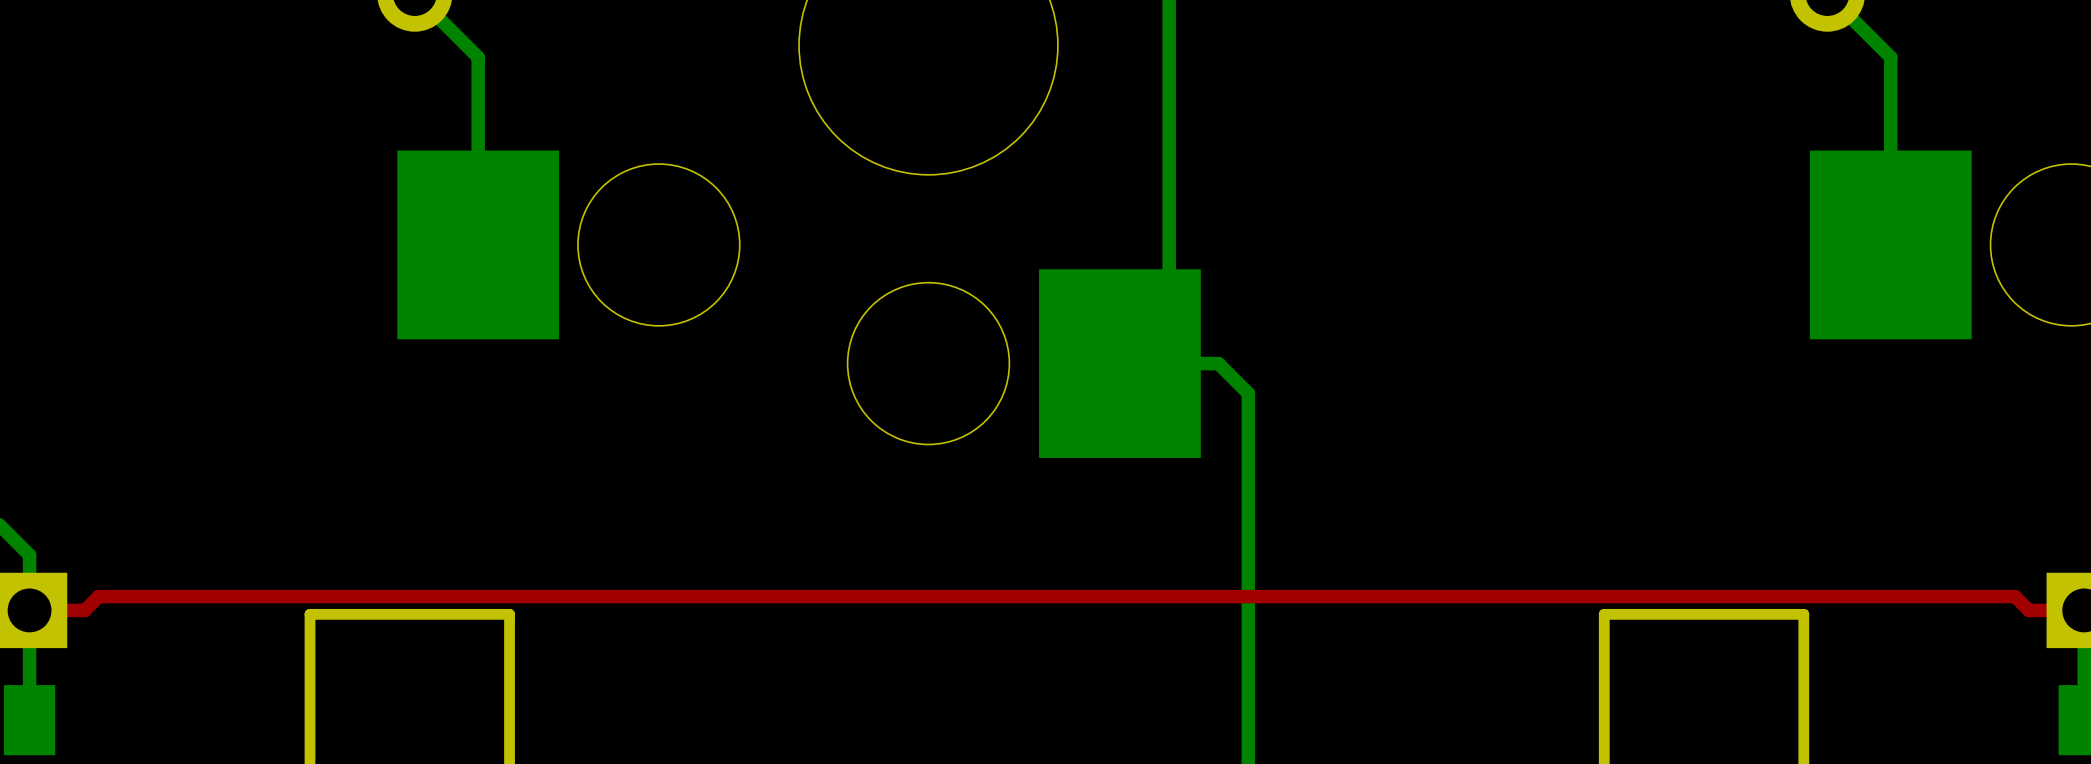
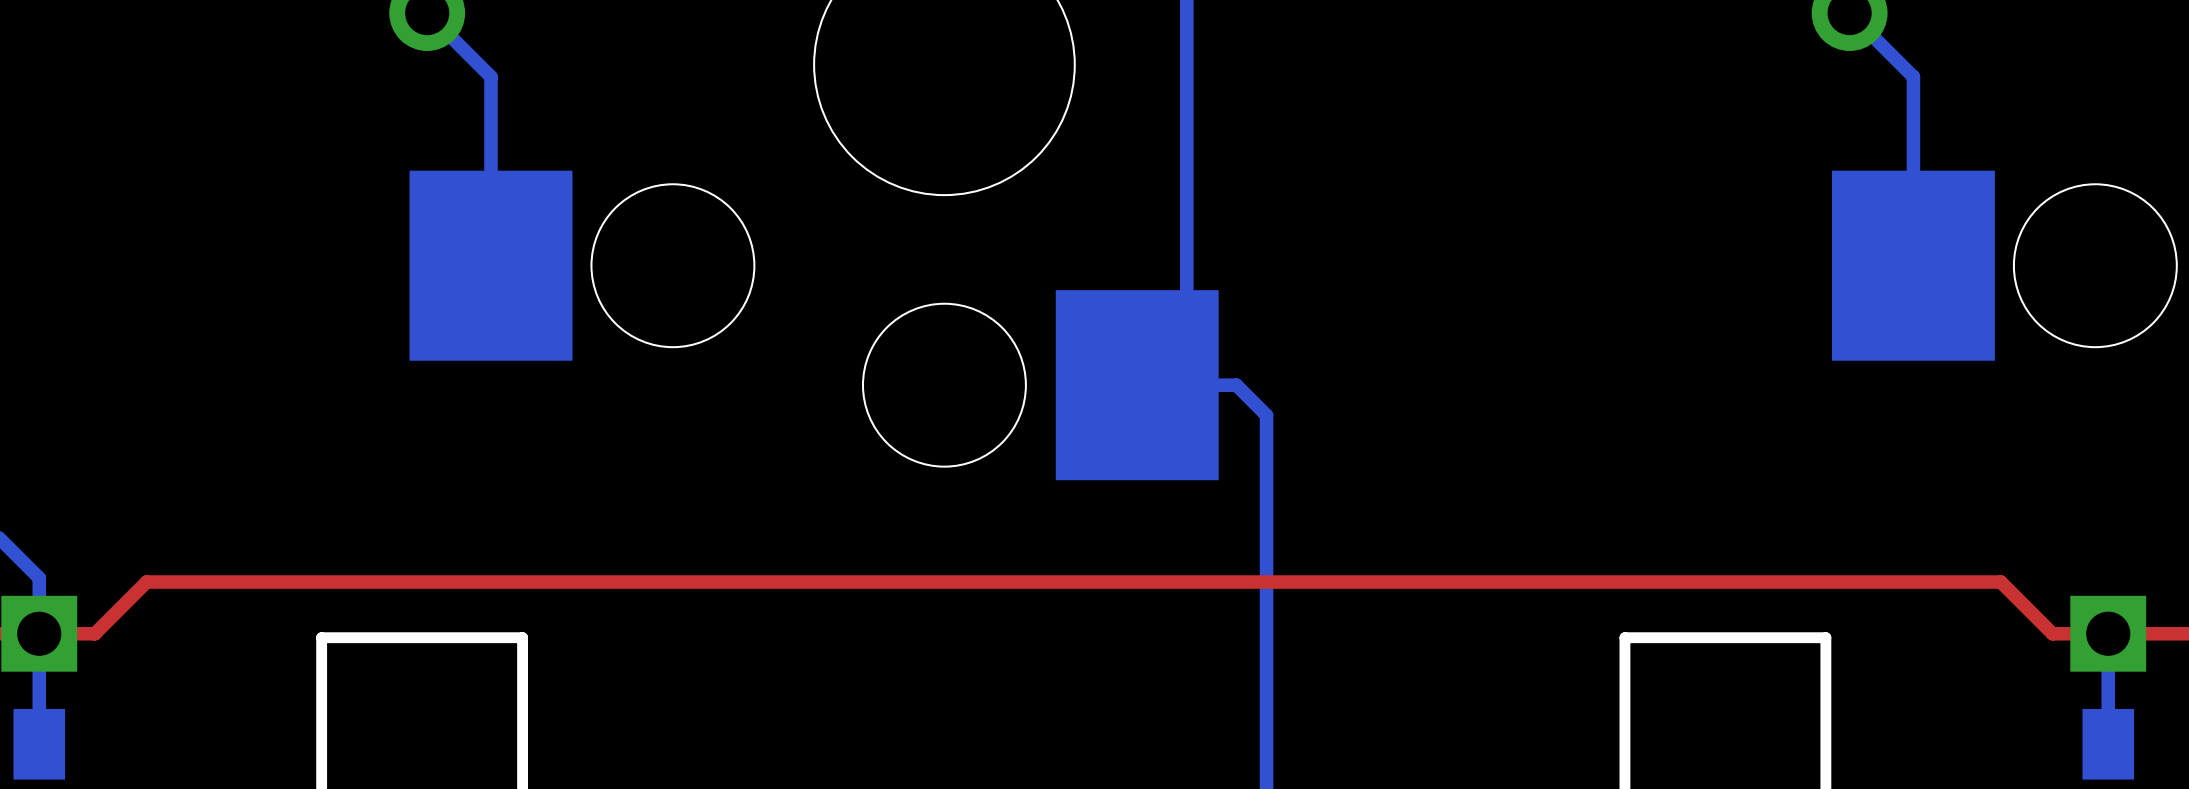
top track: (98, 596) (2015, 596) -> (108, 619) (146, 582) (2000, 582) (2038, 619)

